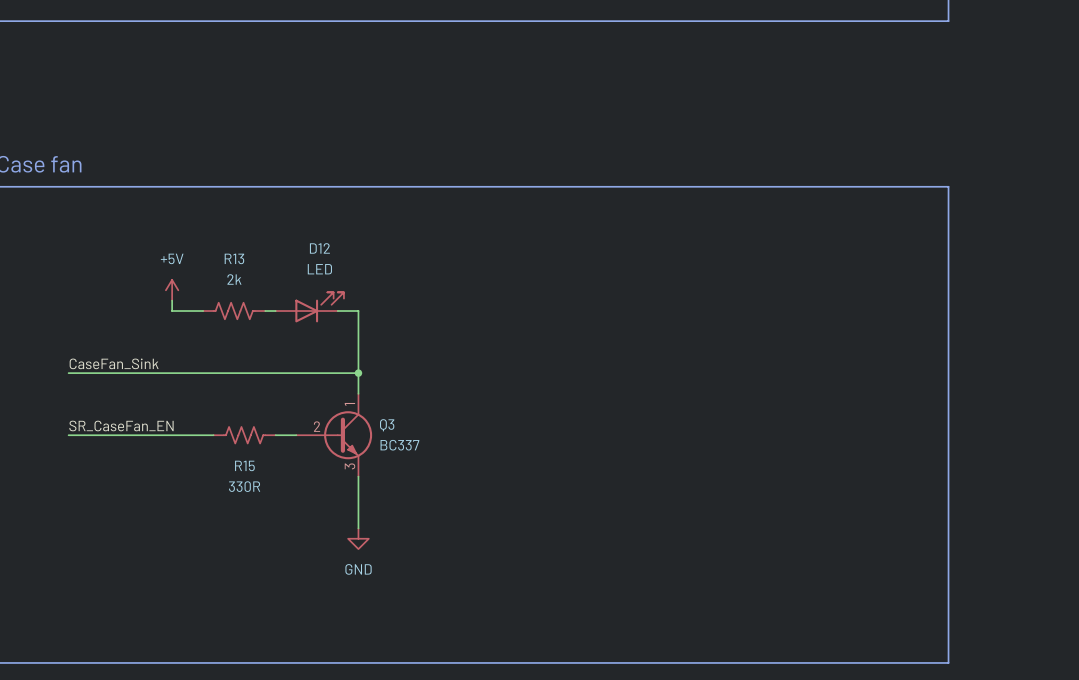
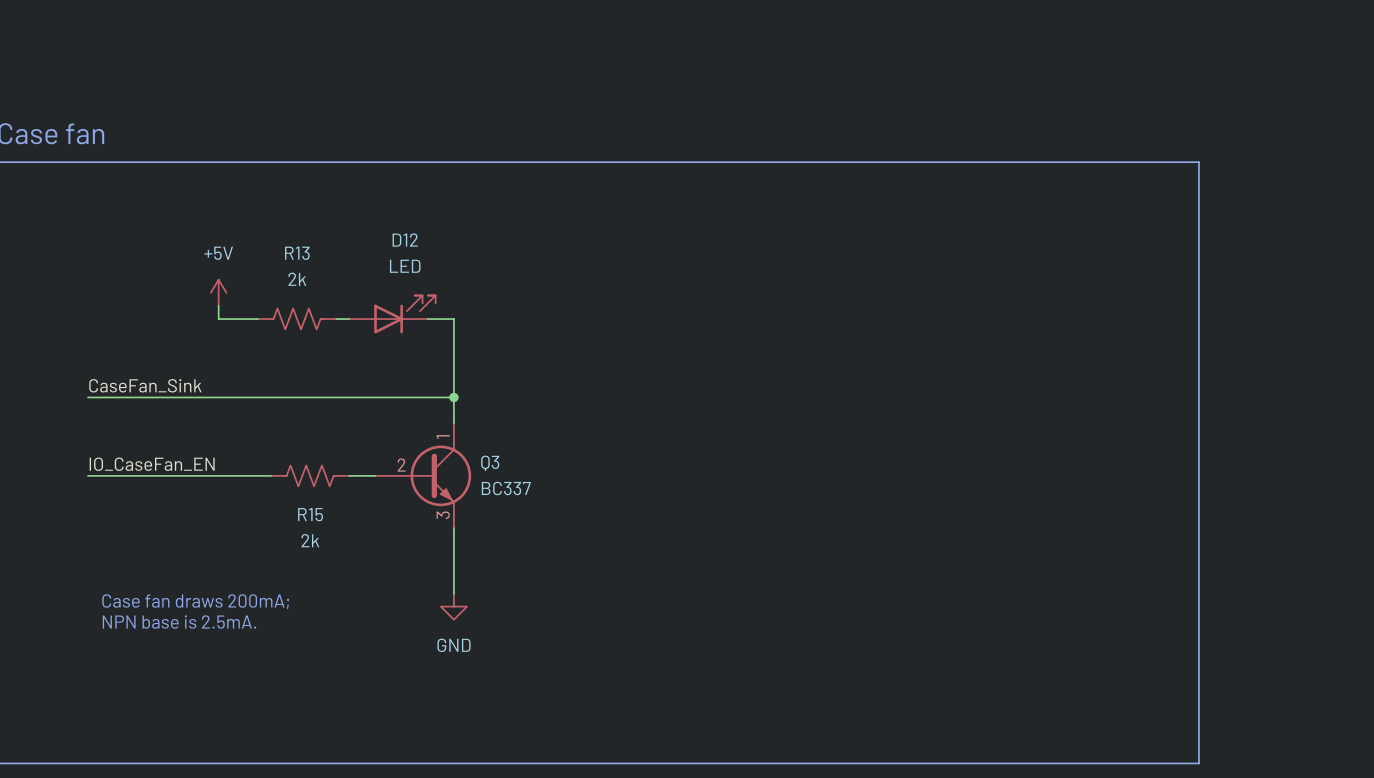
label: SR_CaseFan_EN (121, 426) -> IO_CaseFan_EN (152, 464)
R15 value: 330R (244, 486) -> 2k (310, 540)
text: none -> Case fan draws 200mA; (195, 601)
text: none -> NPN base is 2.5mA. (179, 622)

